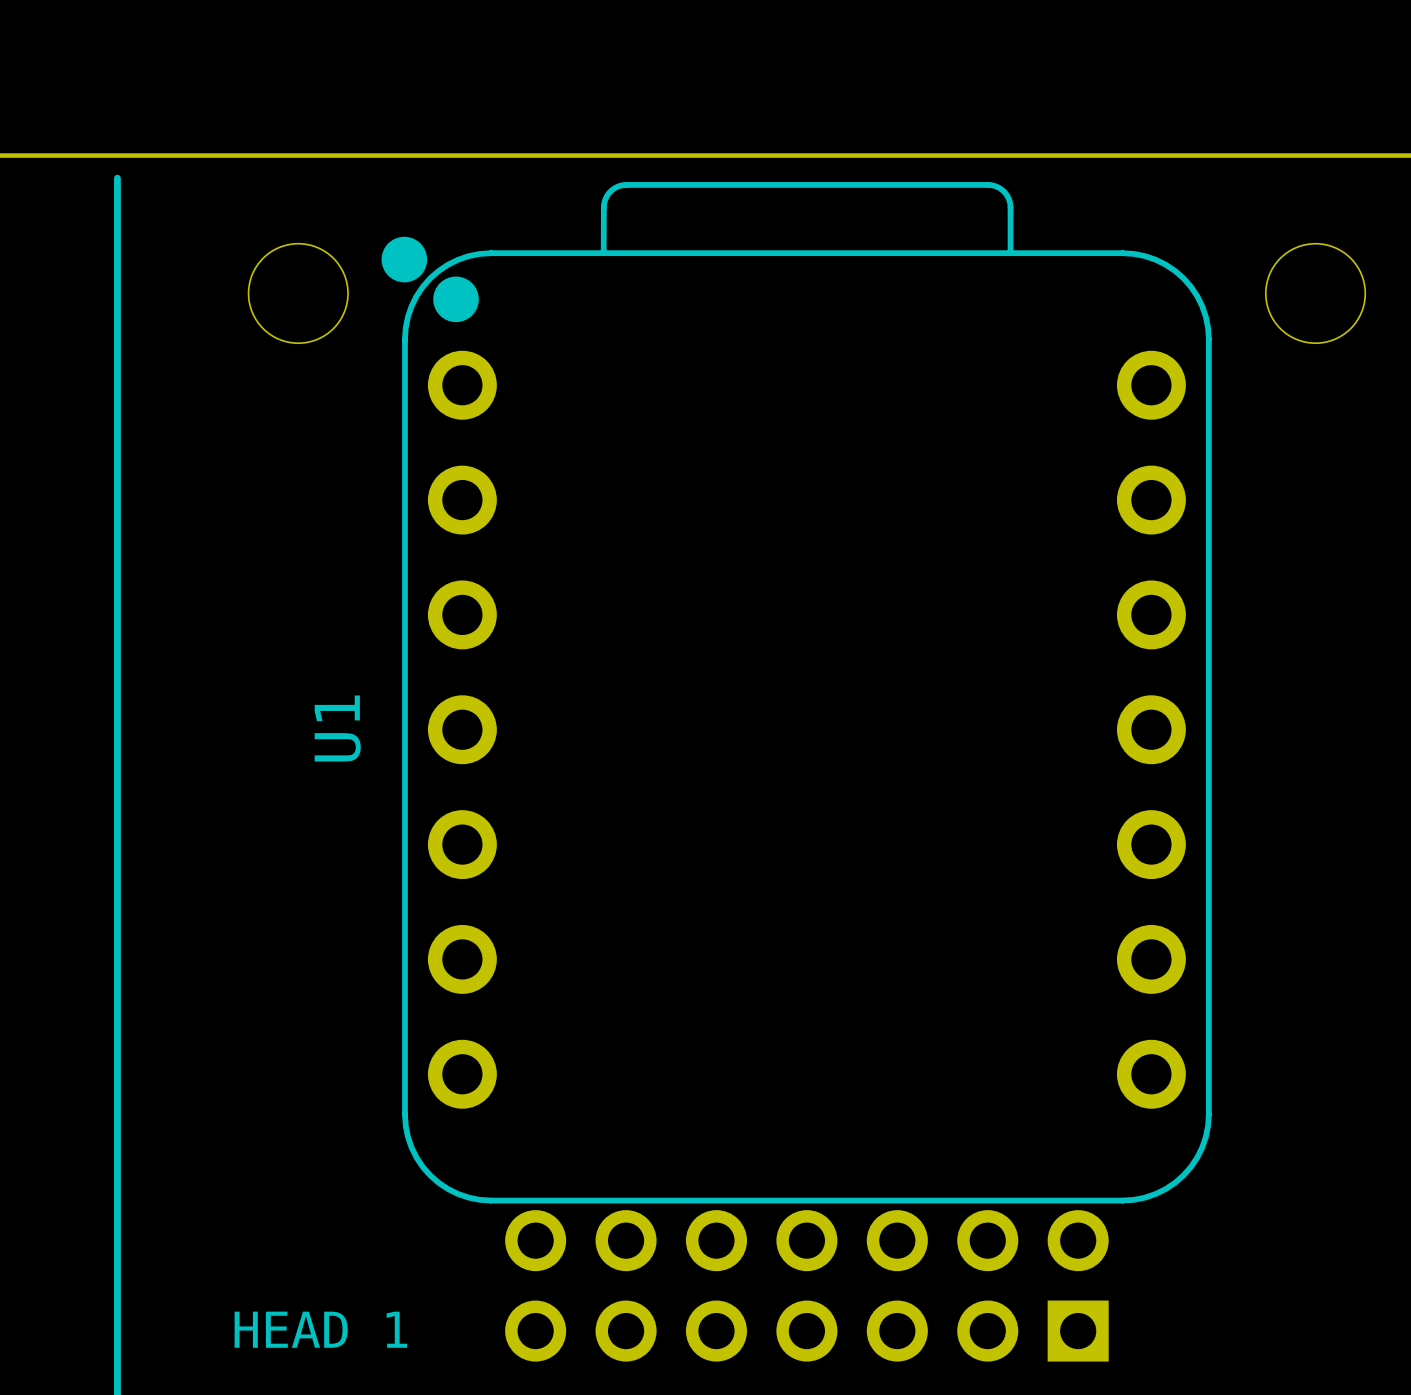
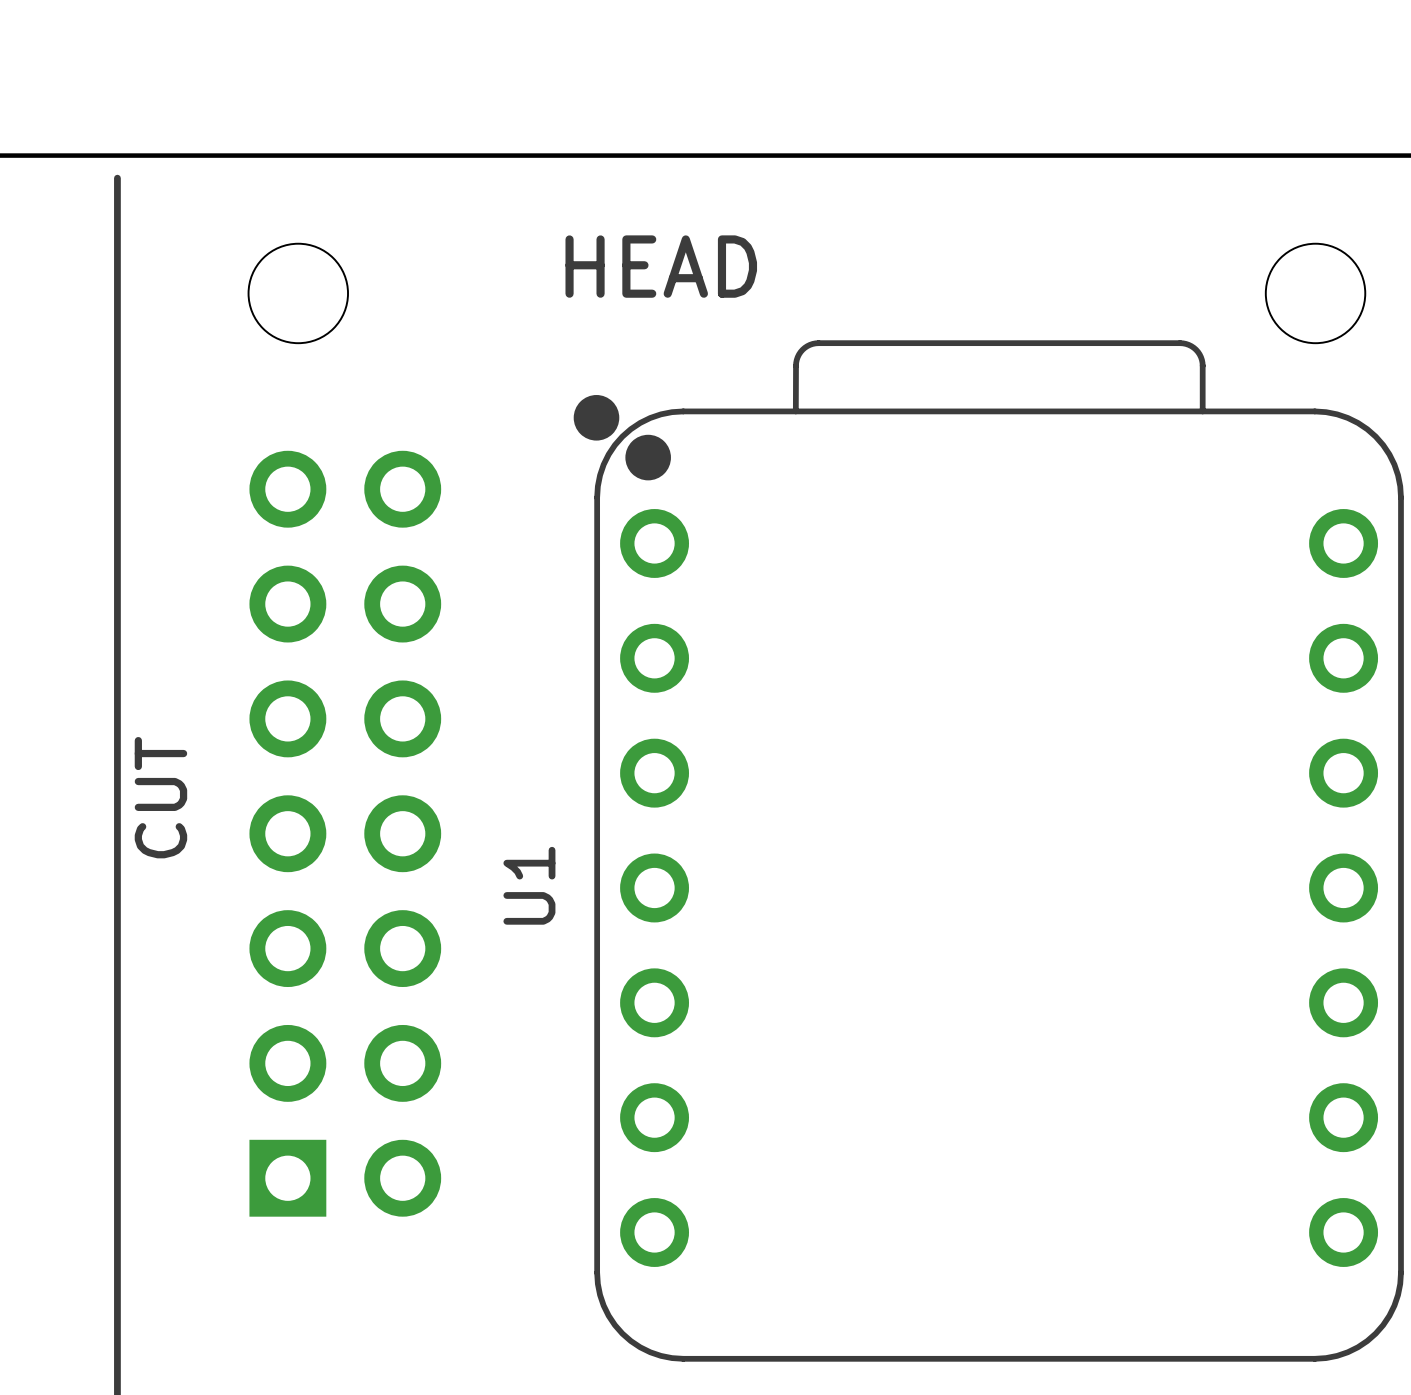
text: none -> HEAD (661, 266)
U1 position: (796, 692) -> (988, 850)
text: none -> CUT (160, 797)
part: none -> (345, 833)
part: (806, 1285) -> none
text: HEAD 1 (320, 1329) -> none

